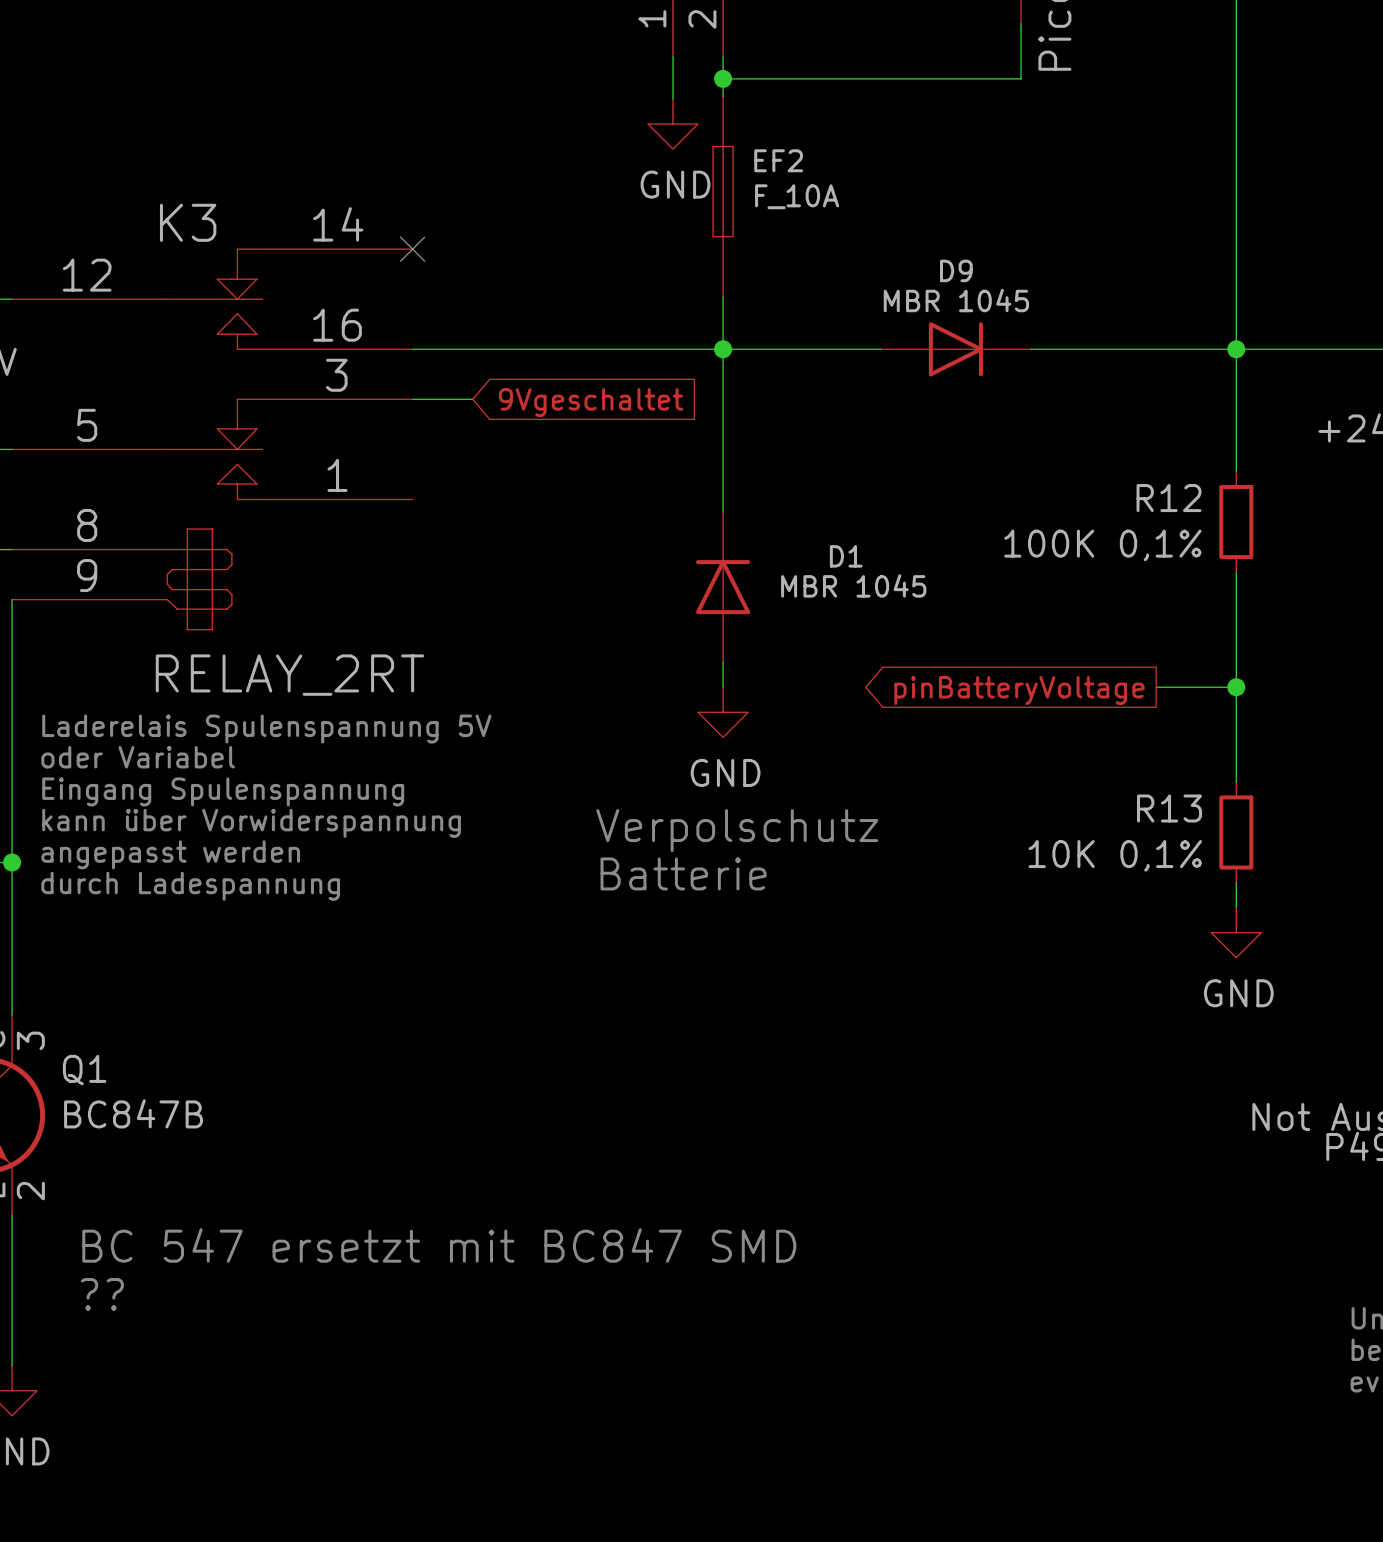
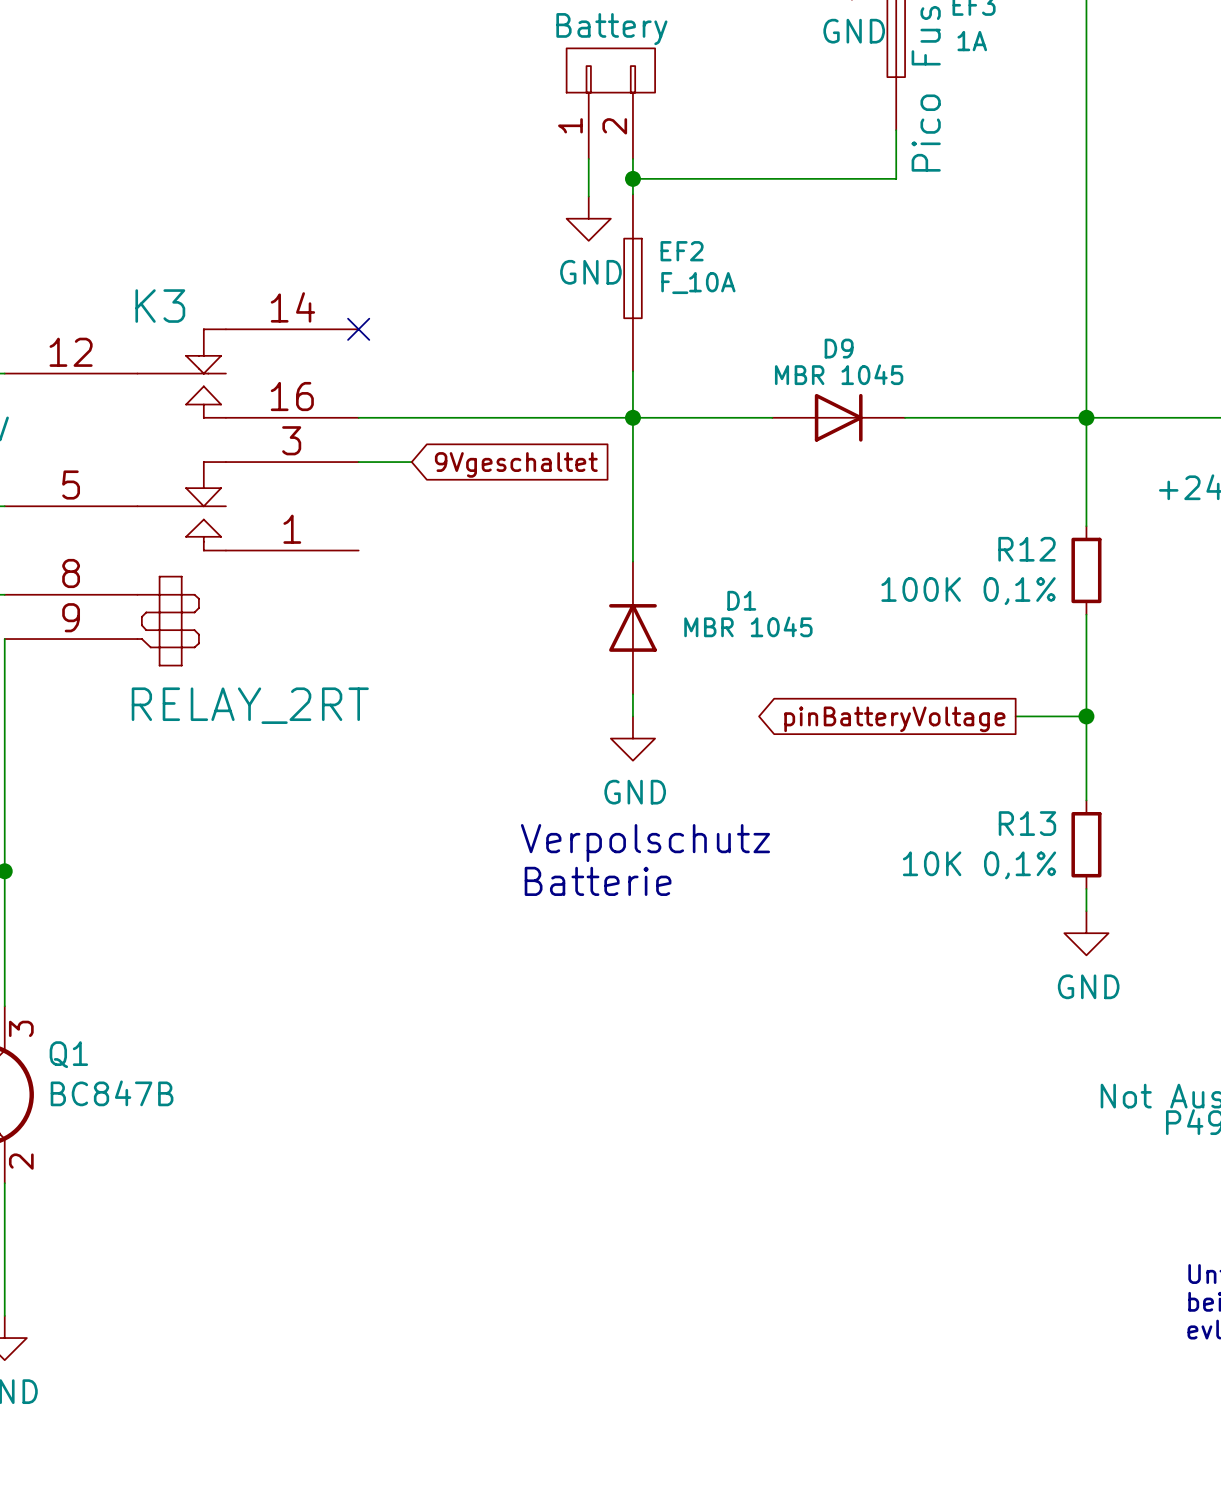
text: Laderelais Spulenspannung 5V (266, 729) -> none
text: oder Variabel (138, 757) -> none
text: Eingang Spulenspannung (223, 791) -> none
text: kann über Vorwiderspannung (251, 823) -> none
text: angepasst werden (170, 854) -> none
text: durch Ladespannung (190, 886) -> none
text: BC 547 ersetzt mit BC847 SMD (439, 1245) -> none
text: ?? (102, 1294) -> none

